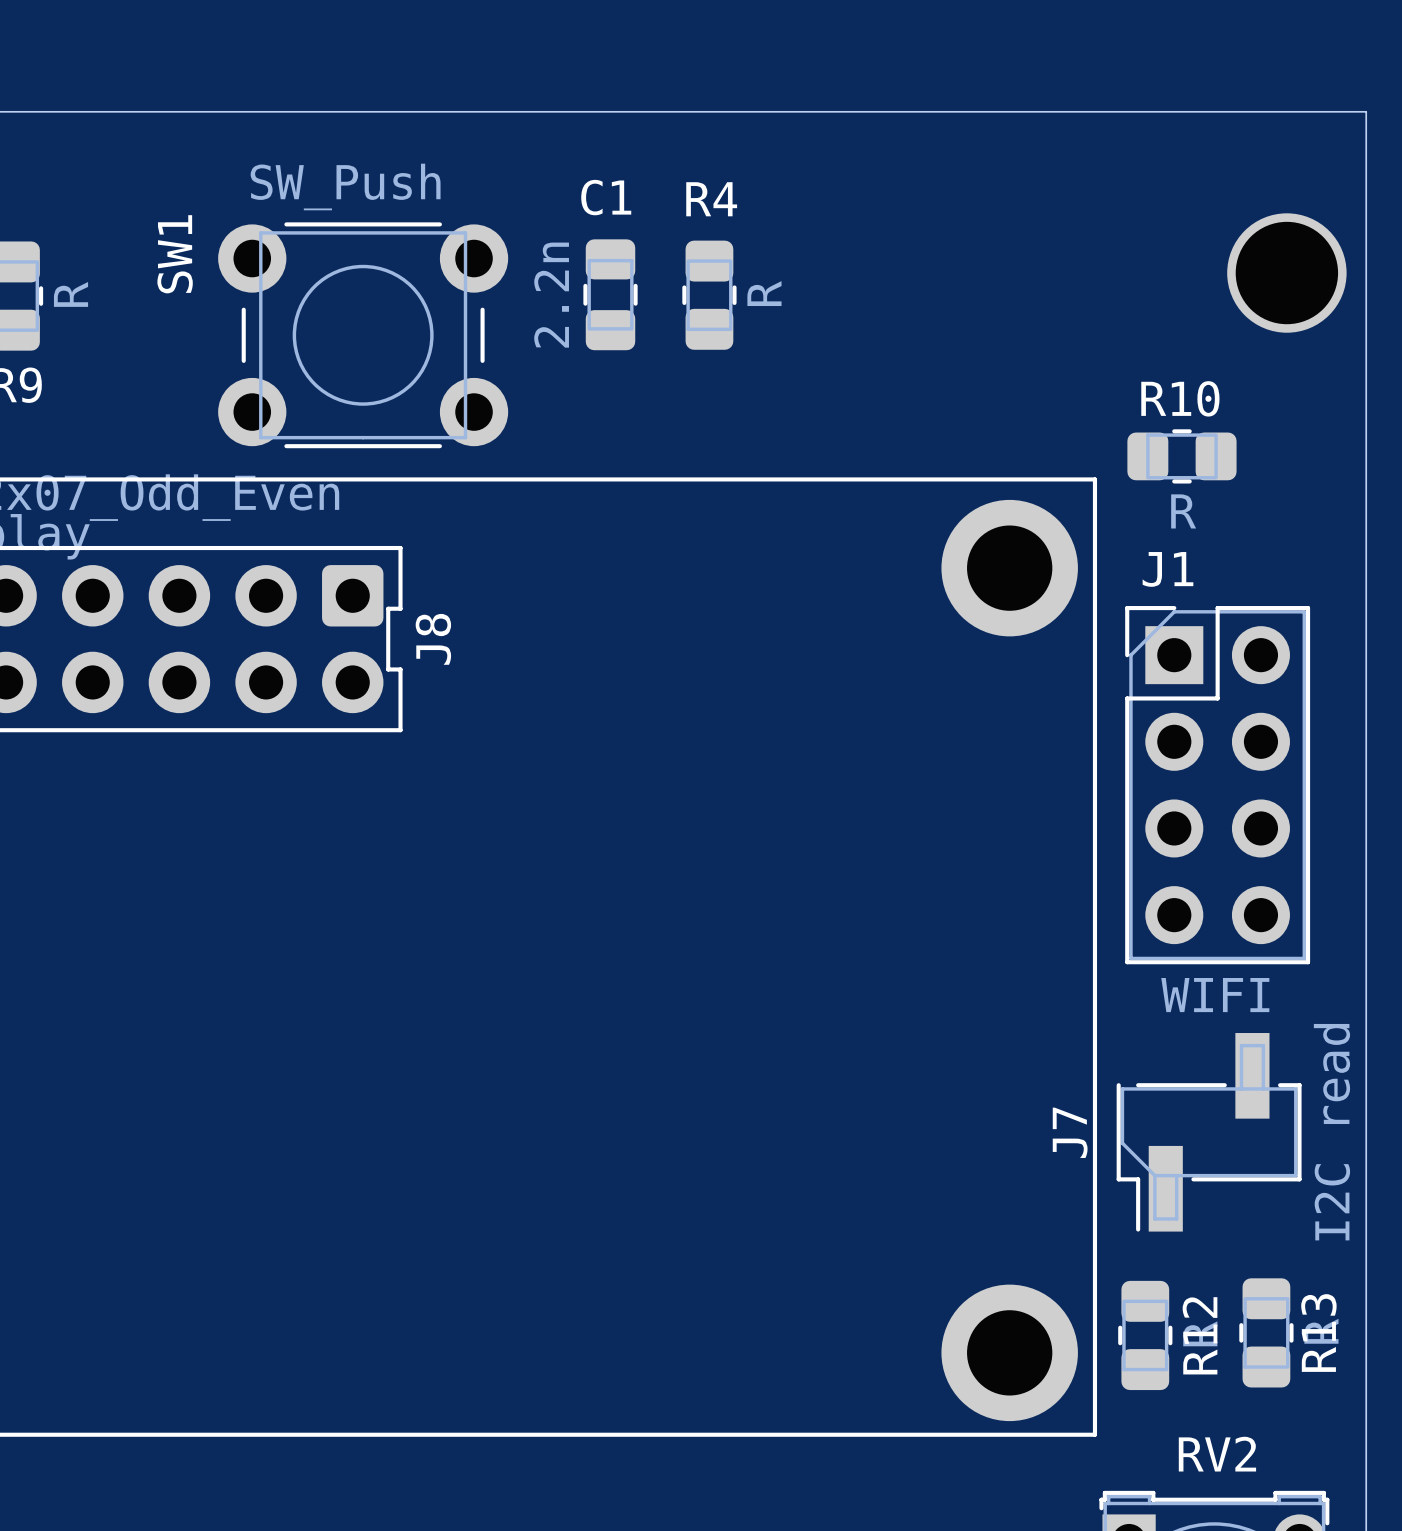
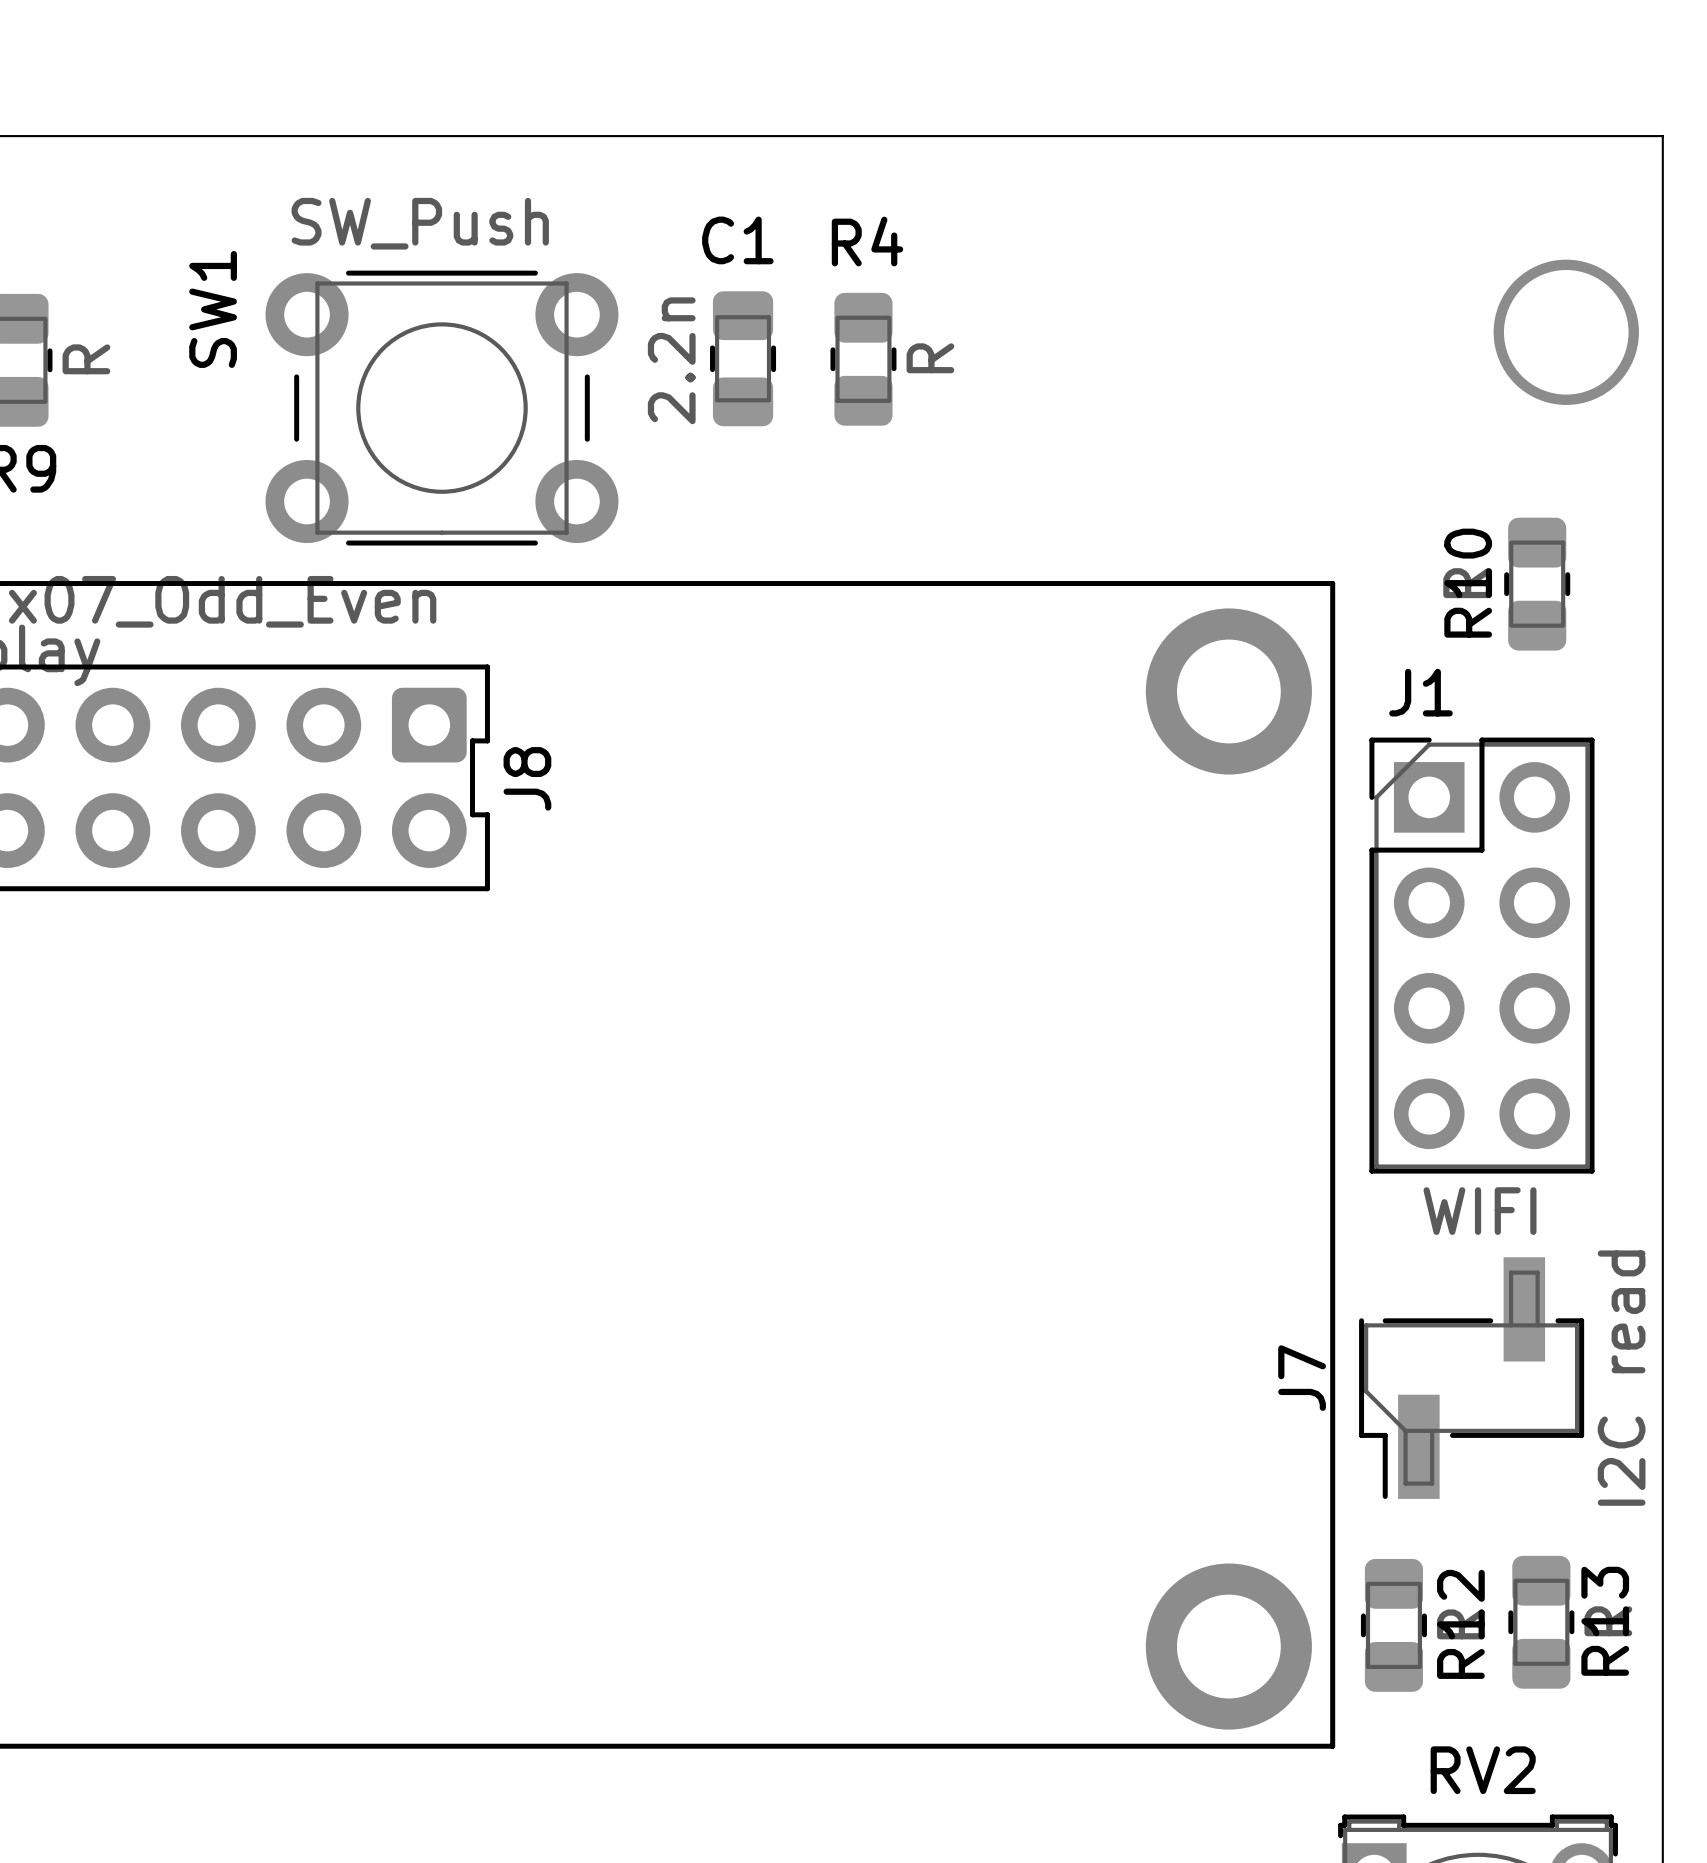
R10 name position: R10 (1180, 398) -> R10 (1468, 583)
R10 rotation: 0° (1181, 456) -> 90° clockwise (1537, 584)
R10 position: (1181, 456) -> (1537, 584)

